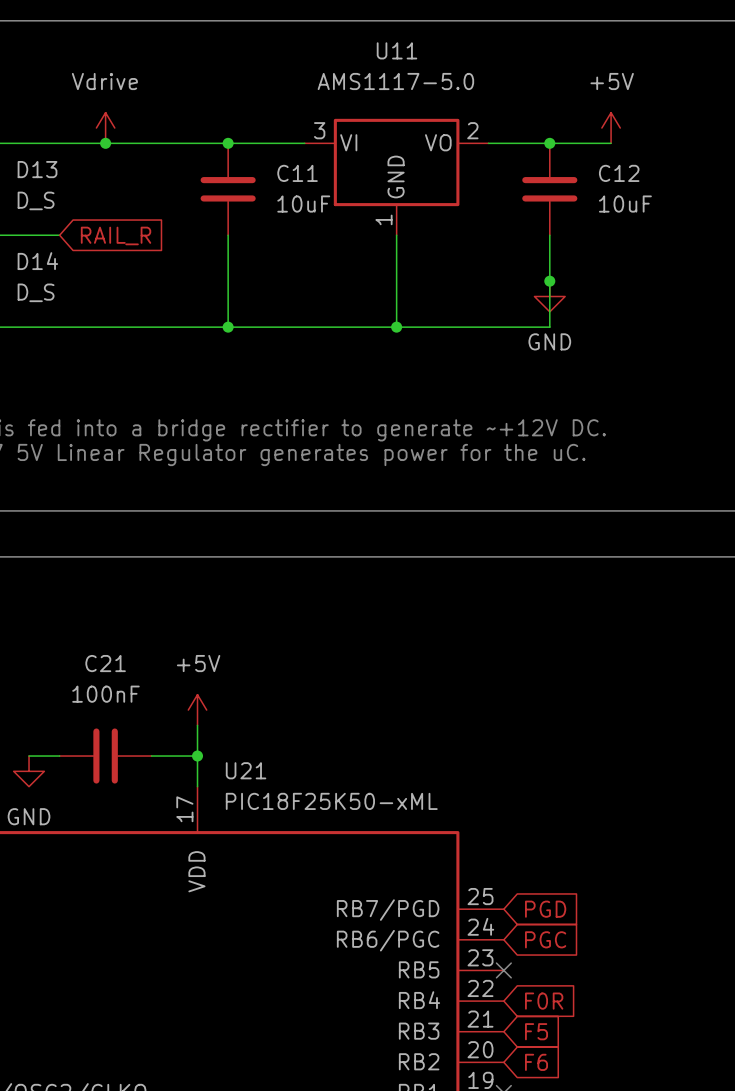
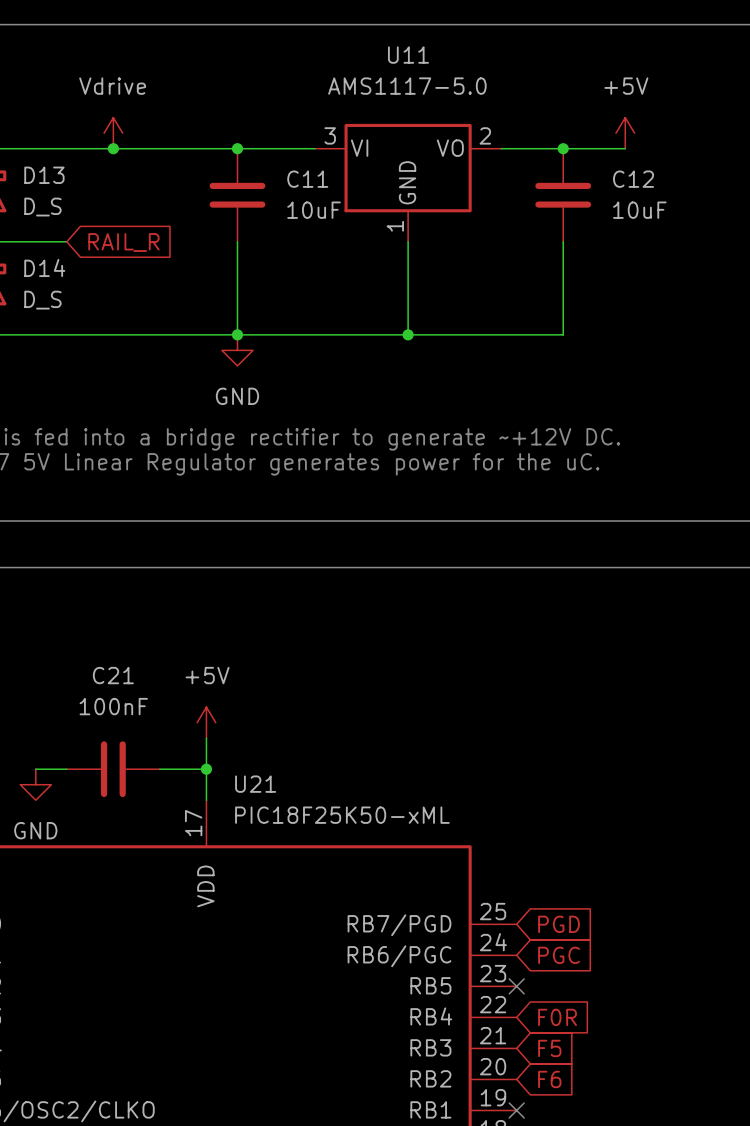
junction: (549, 281) -> none
power symbol: GND (549, 296) -> none
power symbol: none -> GND (237, 350)

